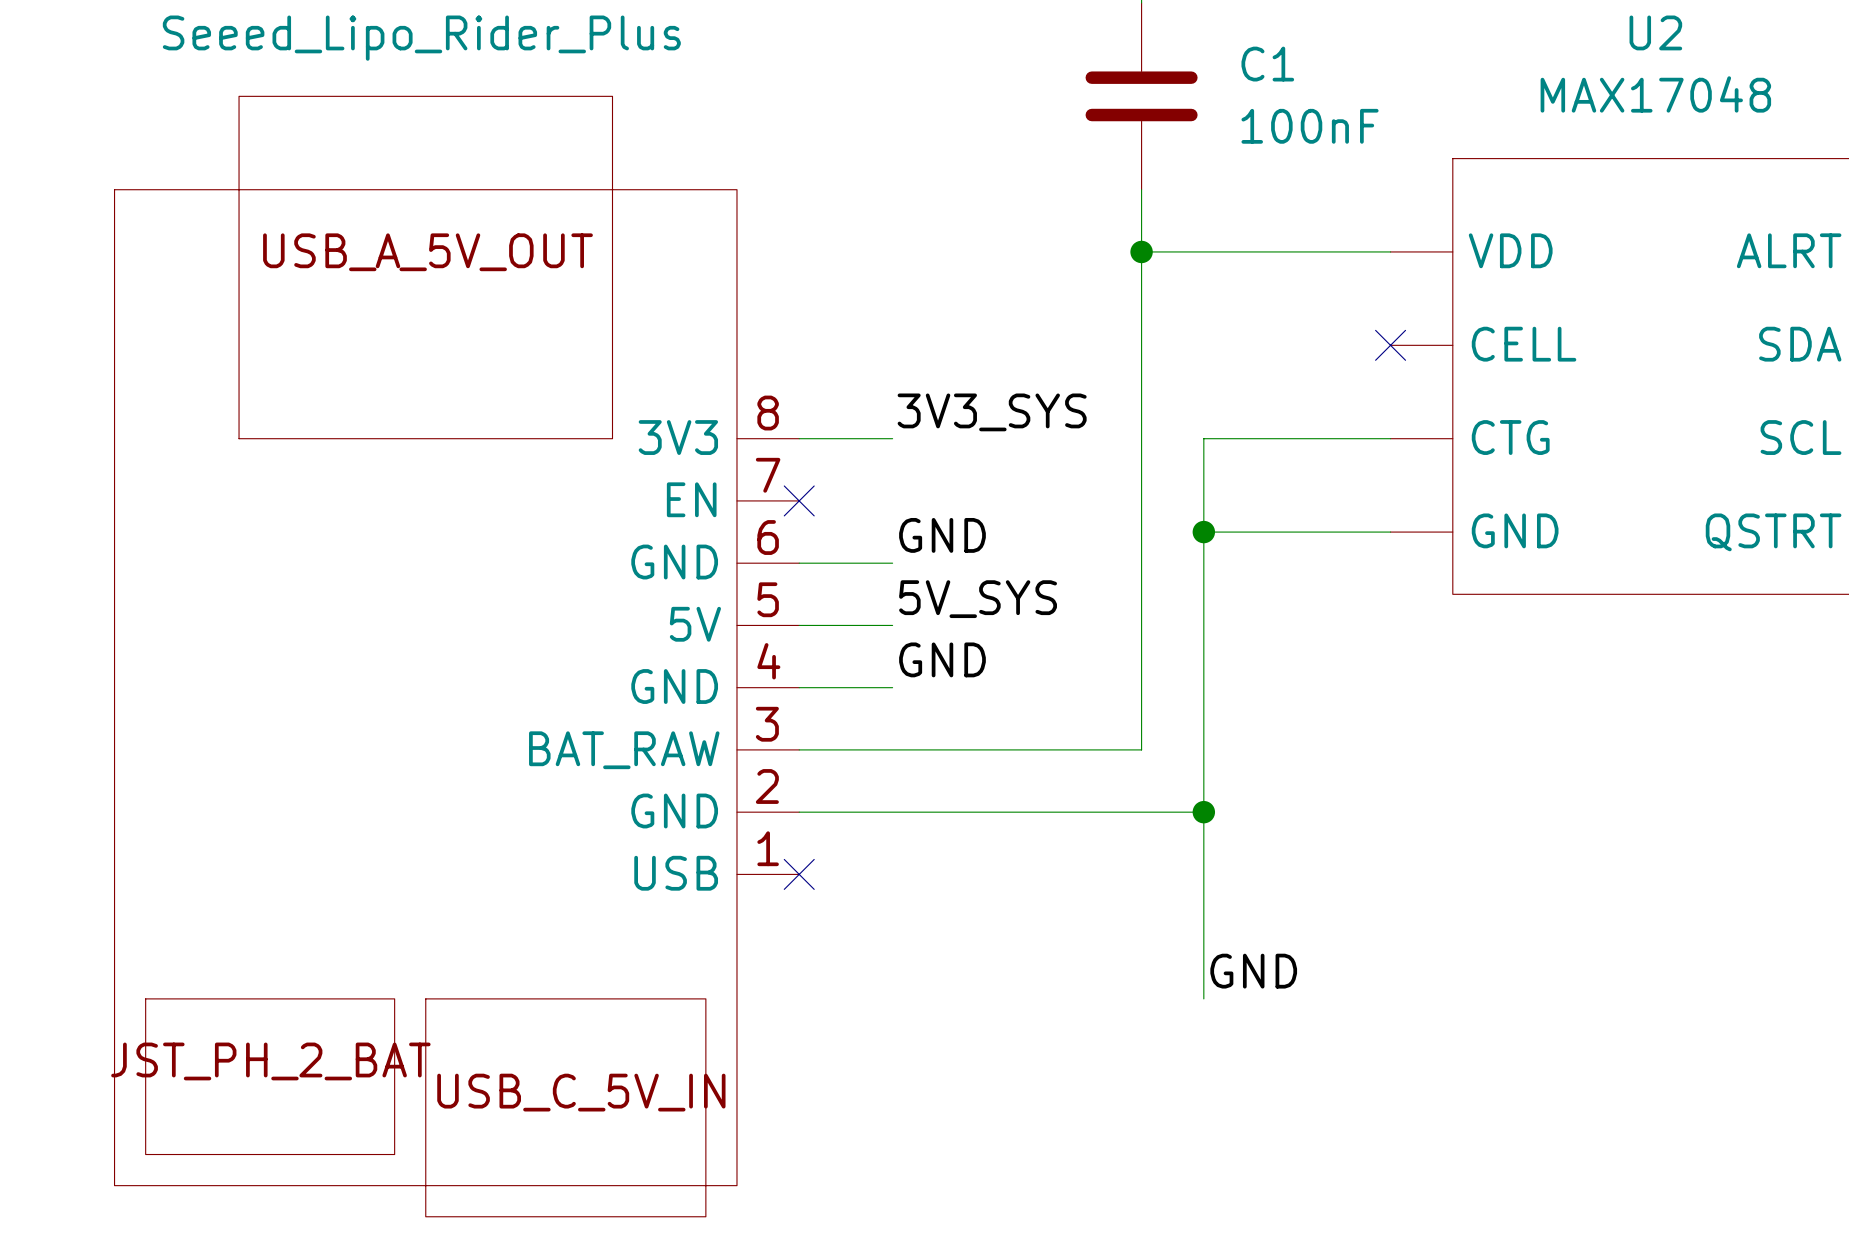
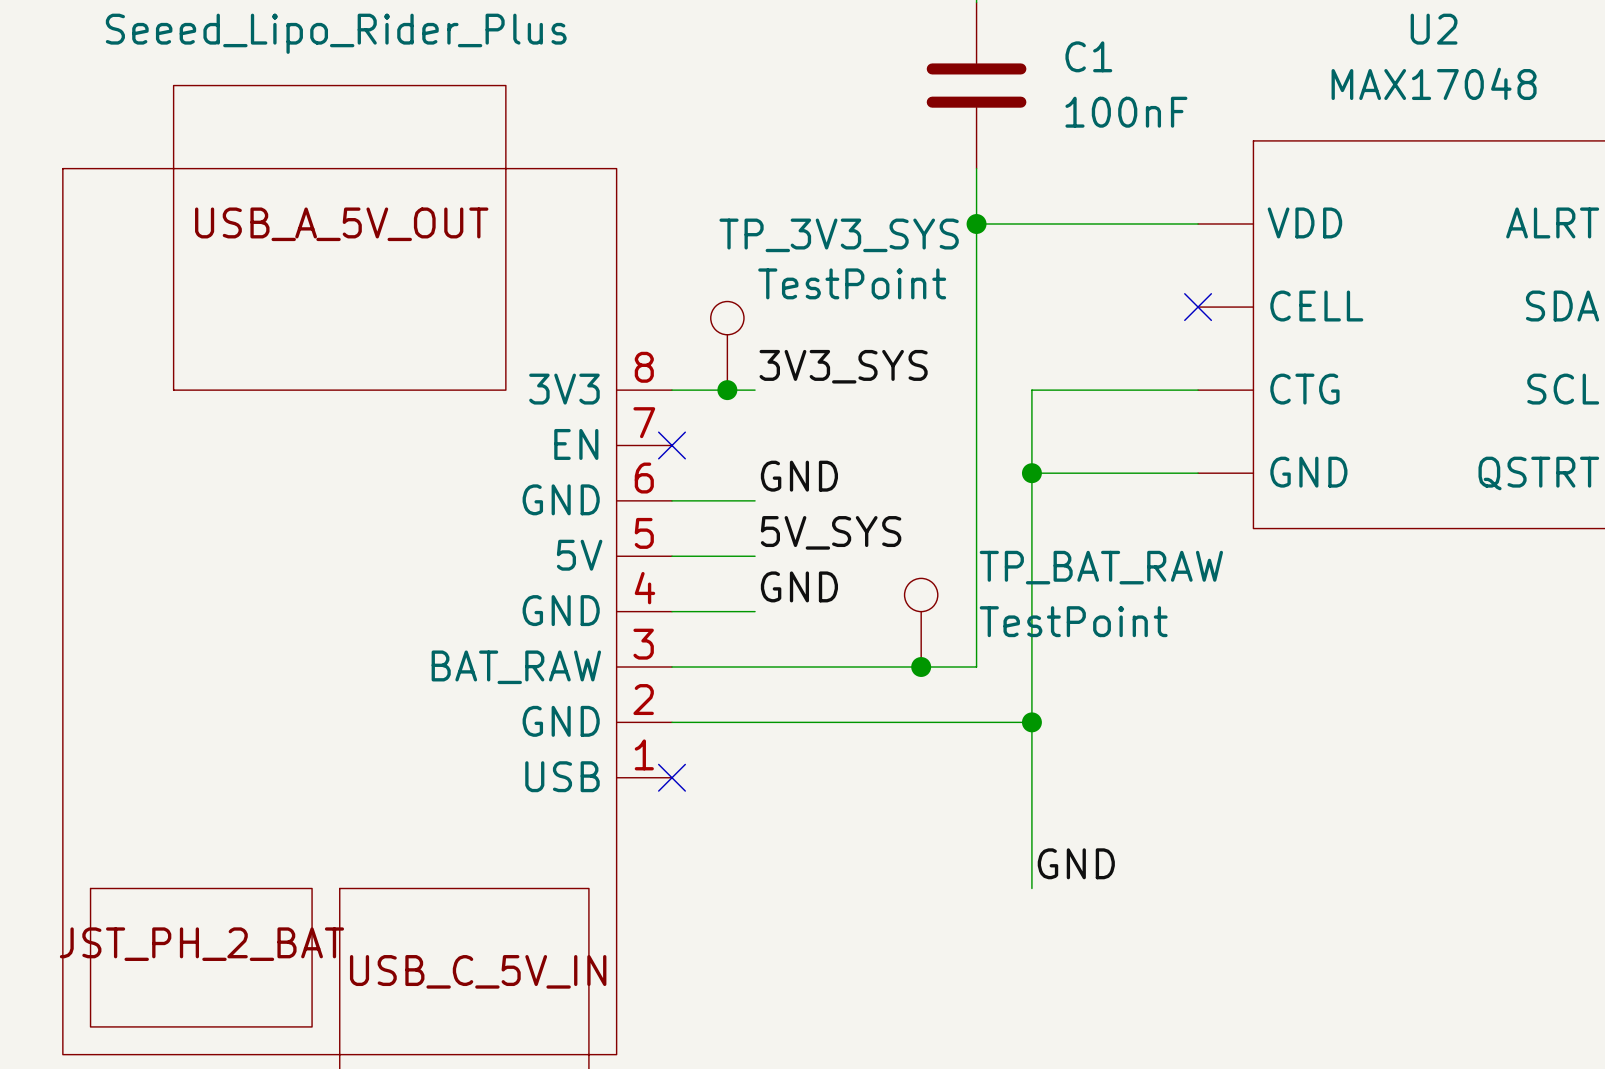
TP_3V3_SYS: none -> TestPoint (727, 345)
junction: none -> (727, 390)
TP_BAT_RAW: none -> TestPoint (921, 622)
junction: none -> (921, 667)

